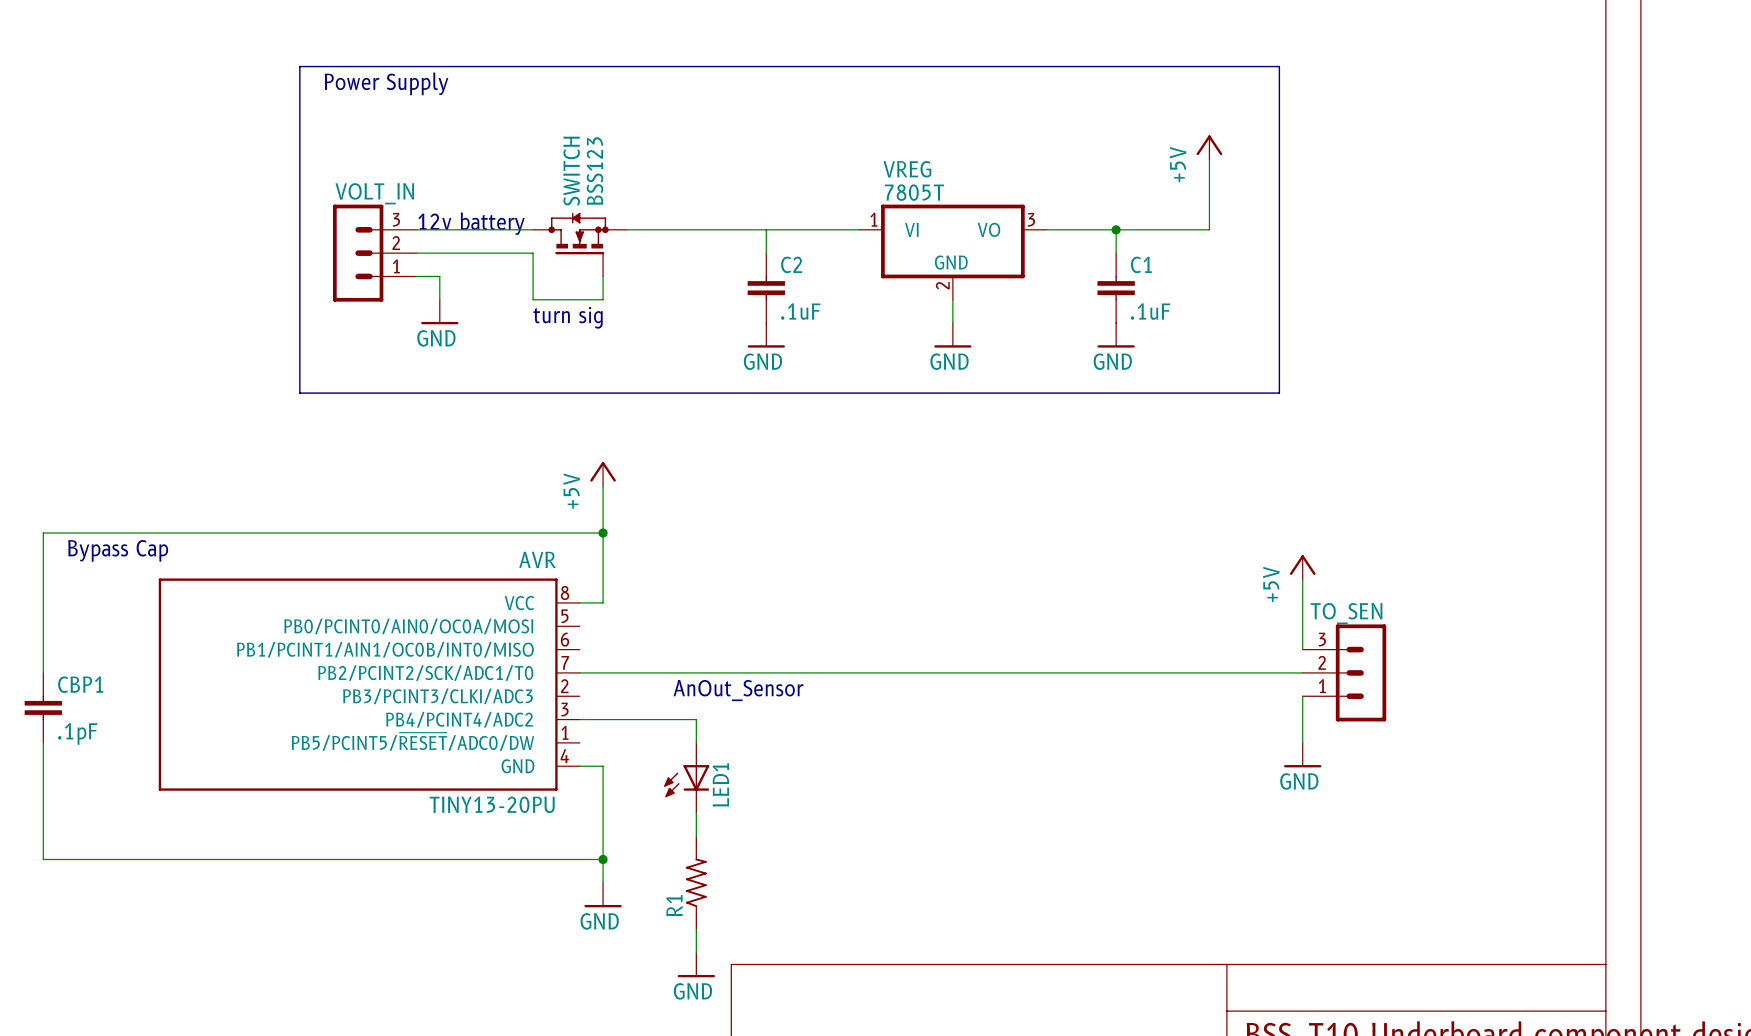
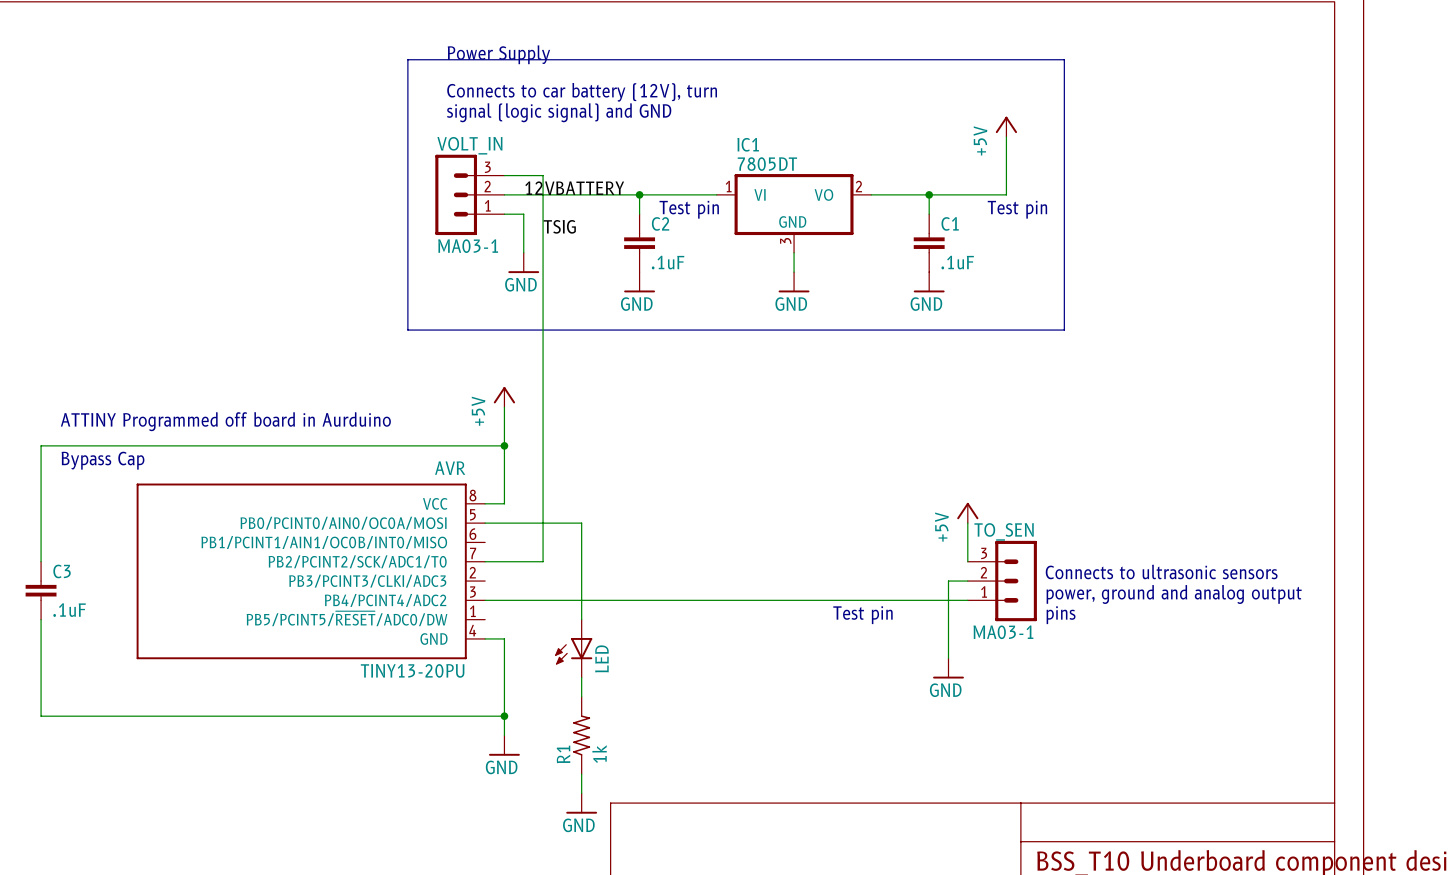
line: (486, 66) (299, 66) (299, 393) (486, 393) -> (407, 59) (407, 330)
text position: Power Supply (386, 83) -> Power Supply (498, 54)
text: none -> Connects to car battery (12V), turn (582, 92)
text: none -> signal (logic signal) and GND (559, 112)
VREG name: VREG (907, 169) -> IC1 (748, 144)
VREG value: 7805T (914, 192) -> 7805DT (767, 164)
VREG pin number: 3 (1031, 219) -> 2 (858, 186)
label: none -> 12VBATTERY (574, 188)
text: 12v battery (471, 223) -> none
wire: (416, 229) (533, 229) -> none
VOLT_IN: none -> MA03-1 (469, 194)
junction: none -> (639, 194)
SWITCH: BSS123 (579, 244) -> none
text: none -> Test pin (689, 209)
text: none -> Test pin (1017, 209)
VOLT_IN: (374, 253) -> none
wire: (416, 253) (533, 253) (533, 299) (603, 299) (603, 276) -> none
wire: none -> (504, 214) (523, 214) (523, 252)
label: none -> TSIG (559, 226)
wire: (416, 276) (439, 276) (439, 299) -> none
VREG pin number: 2 (942, 285) -> 3 (785, 240)
power symbol position: GND (439, 312) -> GND (523, 262)
text: turn sig (568, 317) -> none
text: none -> ATTINY Programmed off board in Aurduino (225, 421)
power symbol position: +5V (1302, 567) -> +5V (967, 512)
wire: (1302, 579) (1302, 649) -> none
wire: none -> (485, 523) (581, 523) (581, 600) (967, 600)
wire: (649, 672) (1302, 672) -> (543, 561) (543, 175) (504, 175)
TO_SEN: (1344, 672) -> none
CBP1 name: CBP1 (80, 684) -> C3 (62, 571)
text: none -> Connects to ultrasonic sensors (1161, 571)
text: AnOut_Sensor (738, 690) -> none
wire: none -> (967, 581) (948, 581) (948, 658)
TO_SEN: none -> MA03-1 (1002, 581)
wire: (1302, 696) (1302, 742) -> (967, 523) (967, 561)
text: none -> power, ground and analog output (1174, 594)
CBP1 value: .1pF (77, 733) -> .1uF (69, 610)
text: none -> Test pin (862, 615)
text: none -> pins (1061, 615)
power symbol position: GND (1302, 755) -> GND (948, 668)
LED1 name: LED1 (720, 784) -> LED (601, 658)
R1 value: none -> 1k (599, 754)

